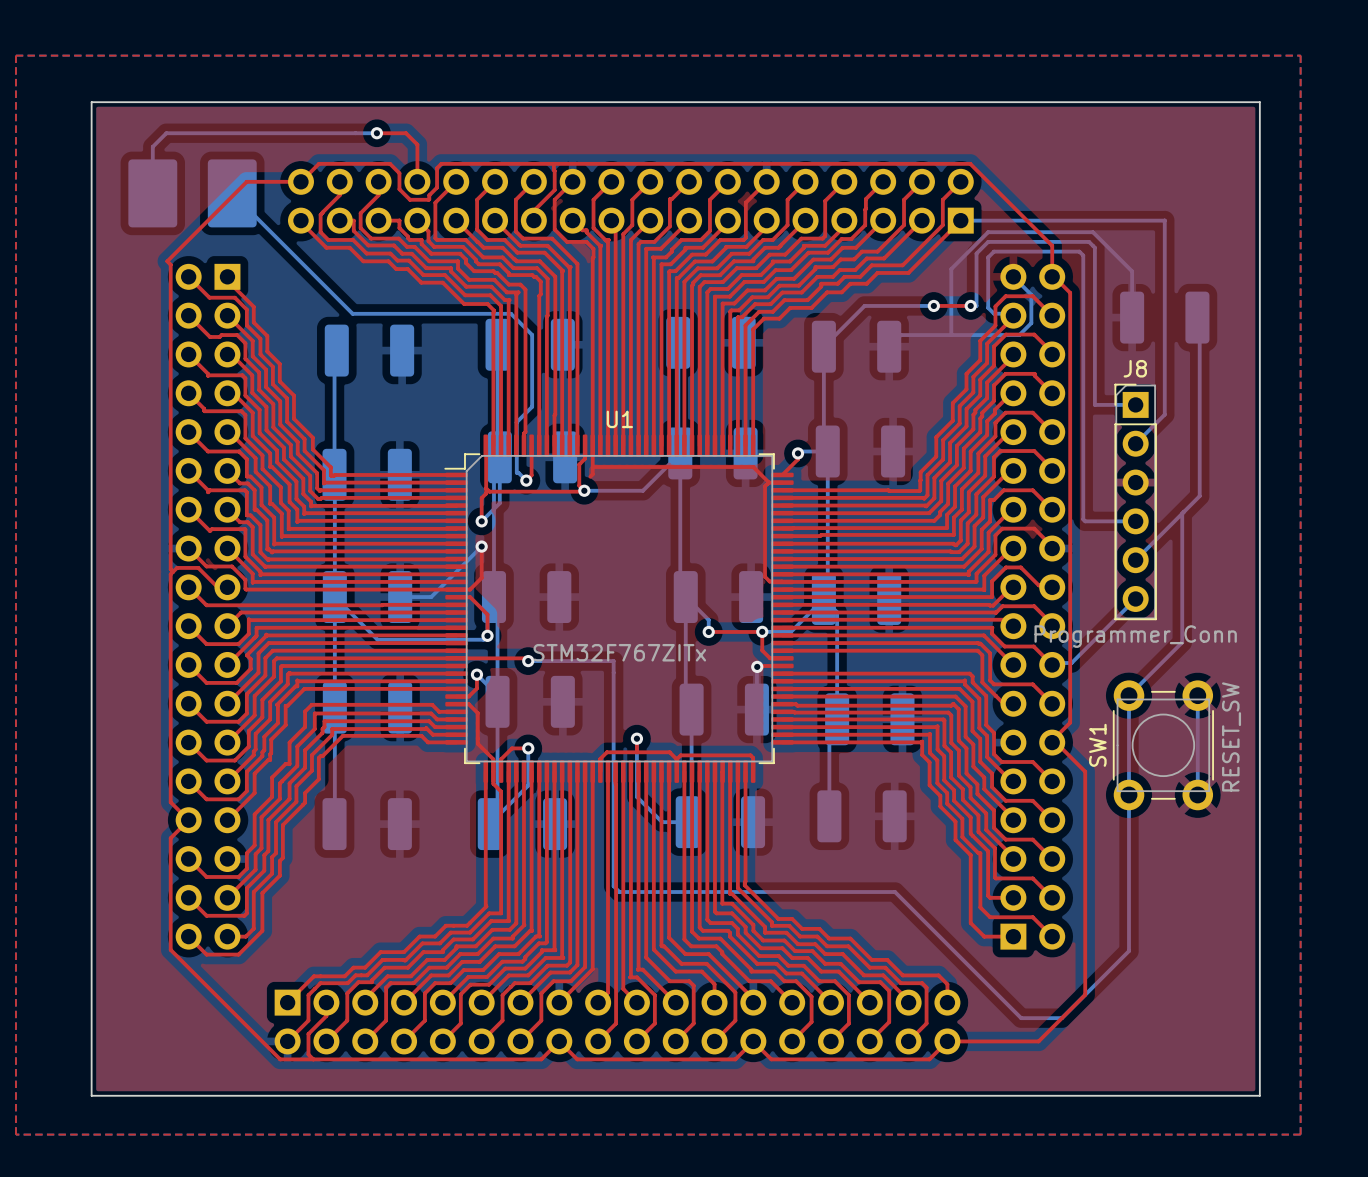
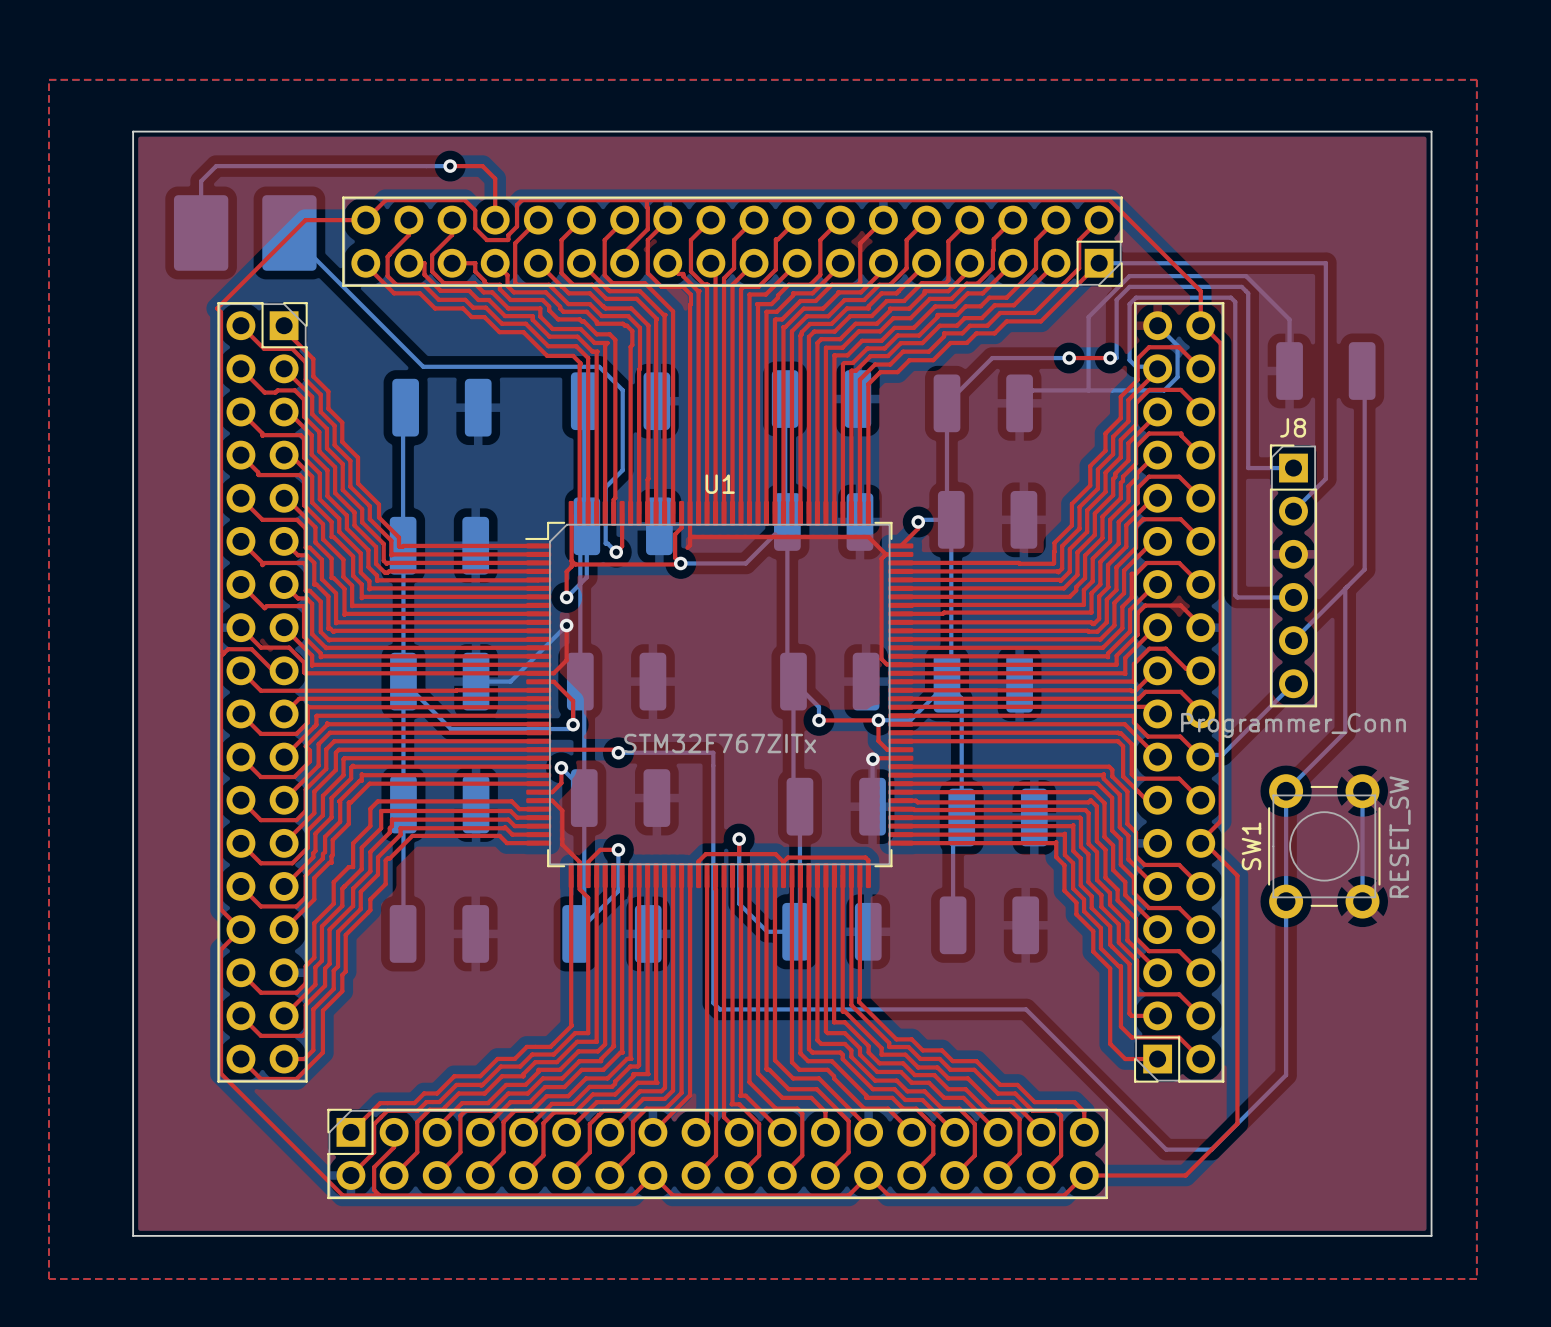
part footprint: [287, 168, 974, 234] -> [342, 196, 1123, 287]
part footprint: [175, 263, 241, 950] -> [217, 302, 308, 1083]
part footprint: [1000, 263, 1066, 950] -> [1134, 302, 1225, 1083]
part footprint: [274, 989, 961, 1055] -> [327, 1108, 1108, 1200]

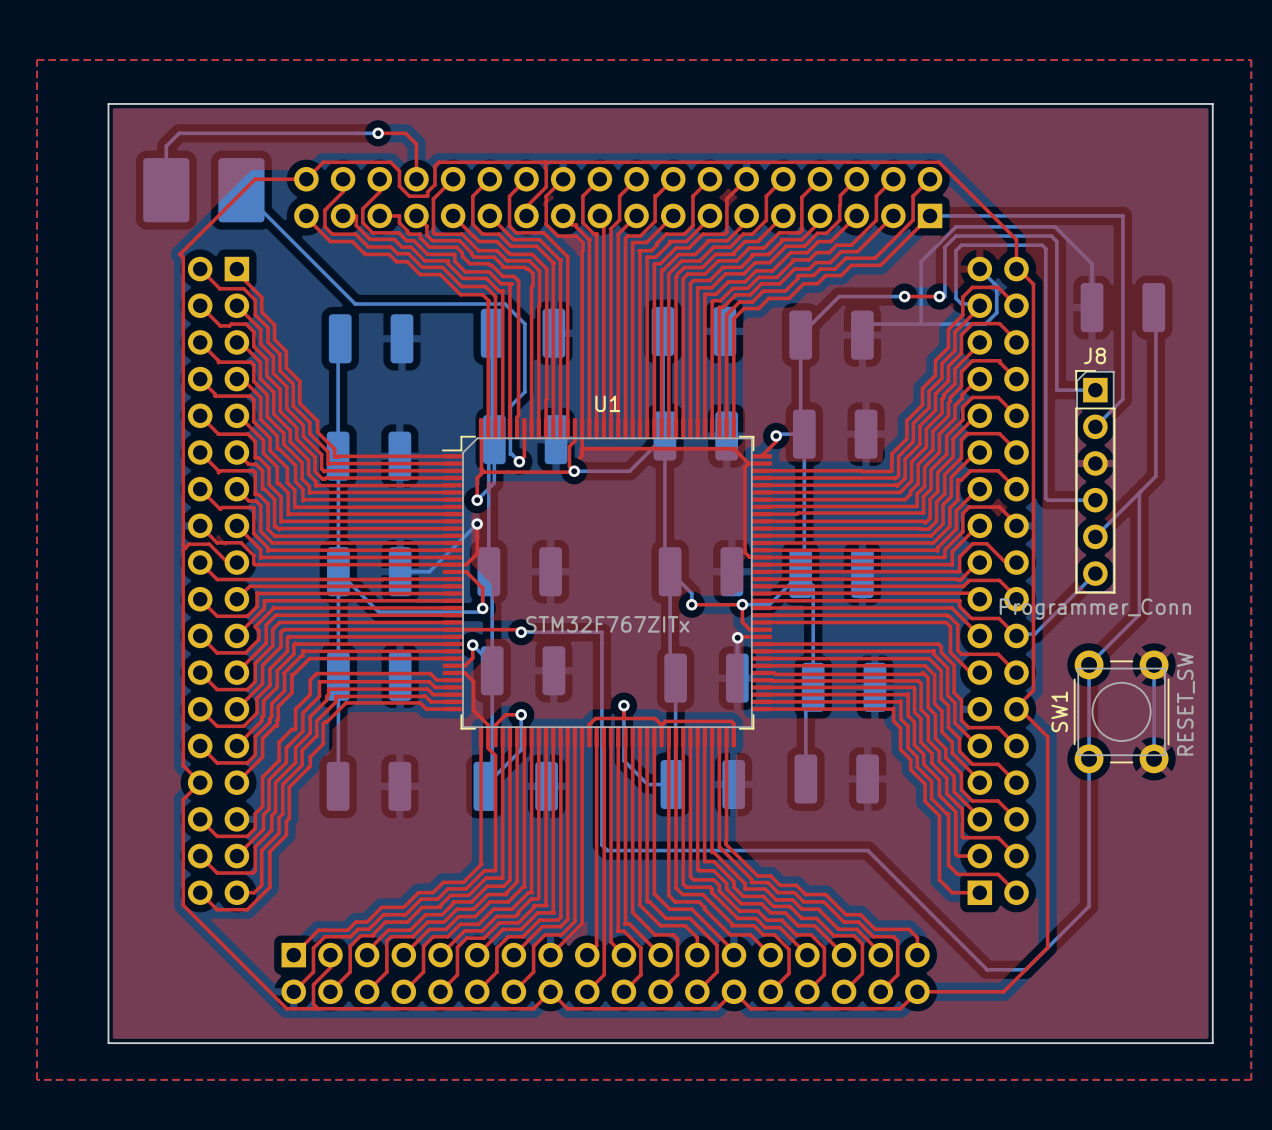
part footprint: [342, 196, 1123, 287] -> [294, 166, 943, 229]
part footprint: [217, 302, 308, 1083] -> [187, 256, 250, 906]
part footprint: [1134, 302, 1225, 1083] -> [967, 256, 1029, 906]
part footprint: [327, 1108, 1108, 1200] -> [281, 942, 930, 1005]

